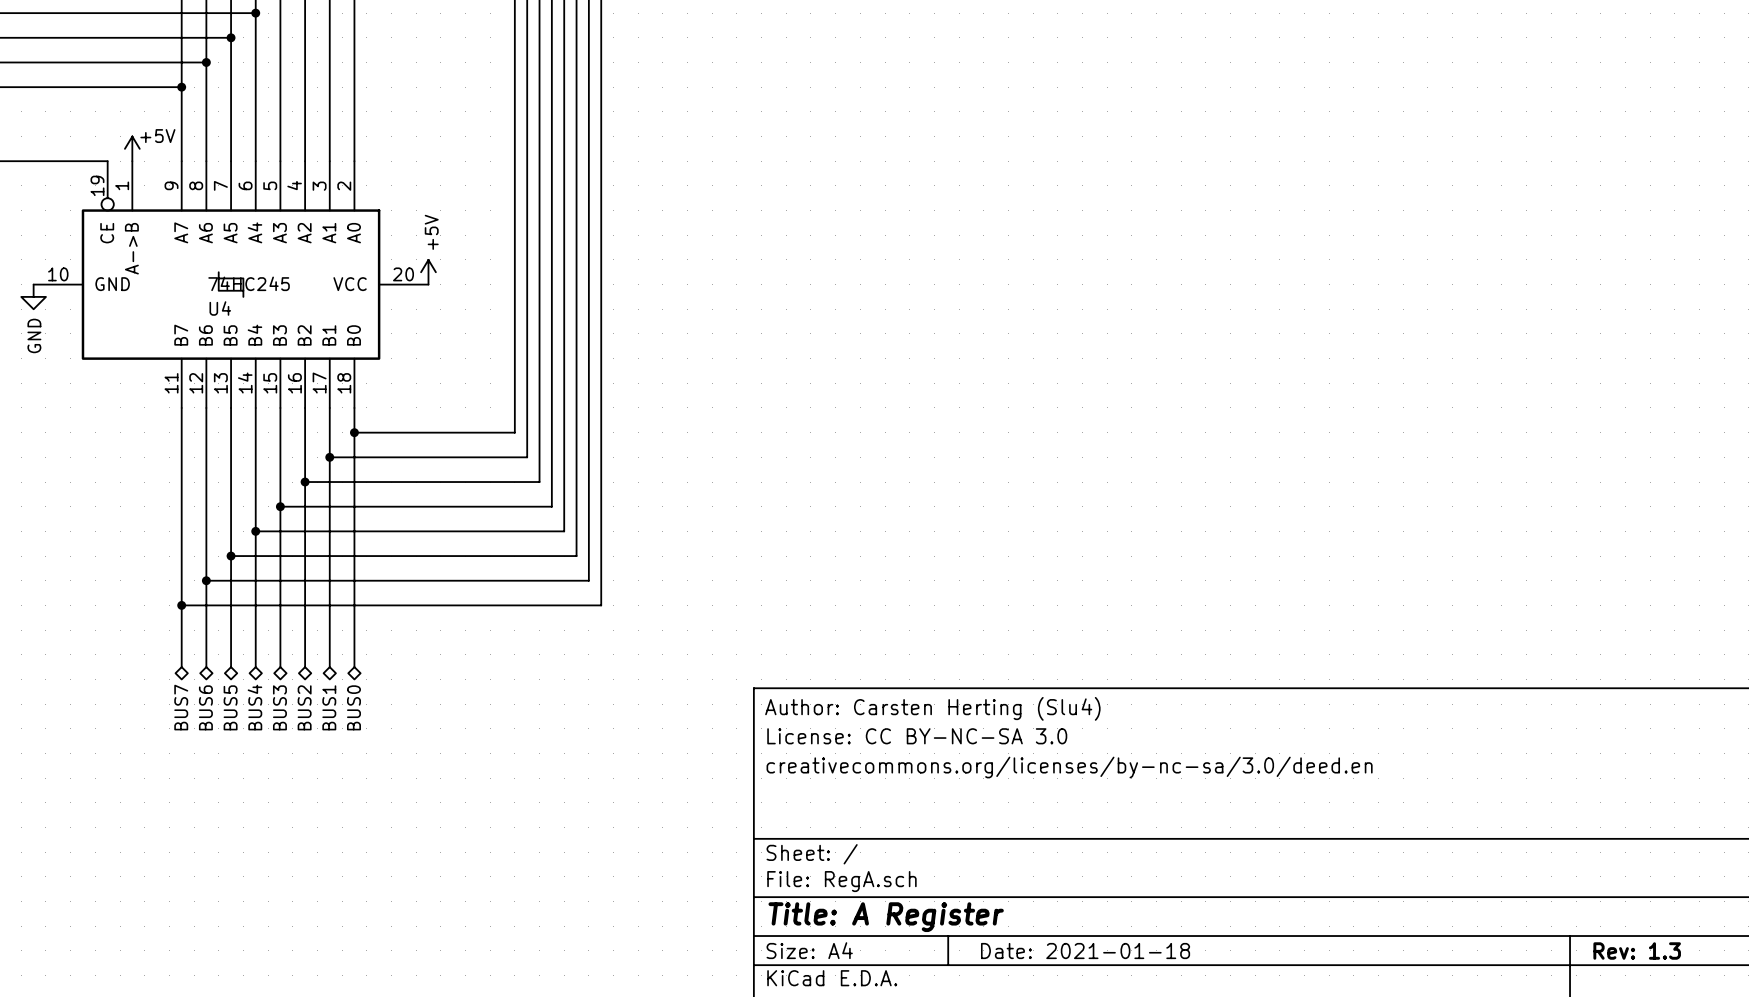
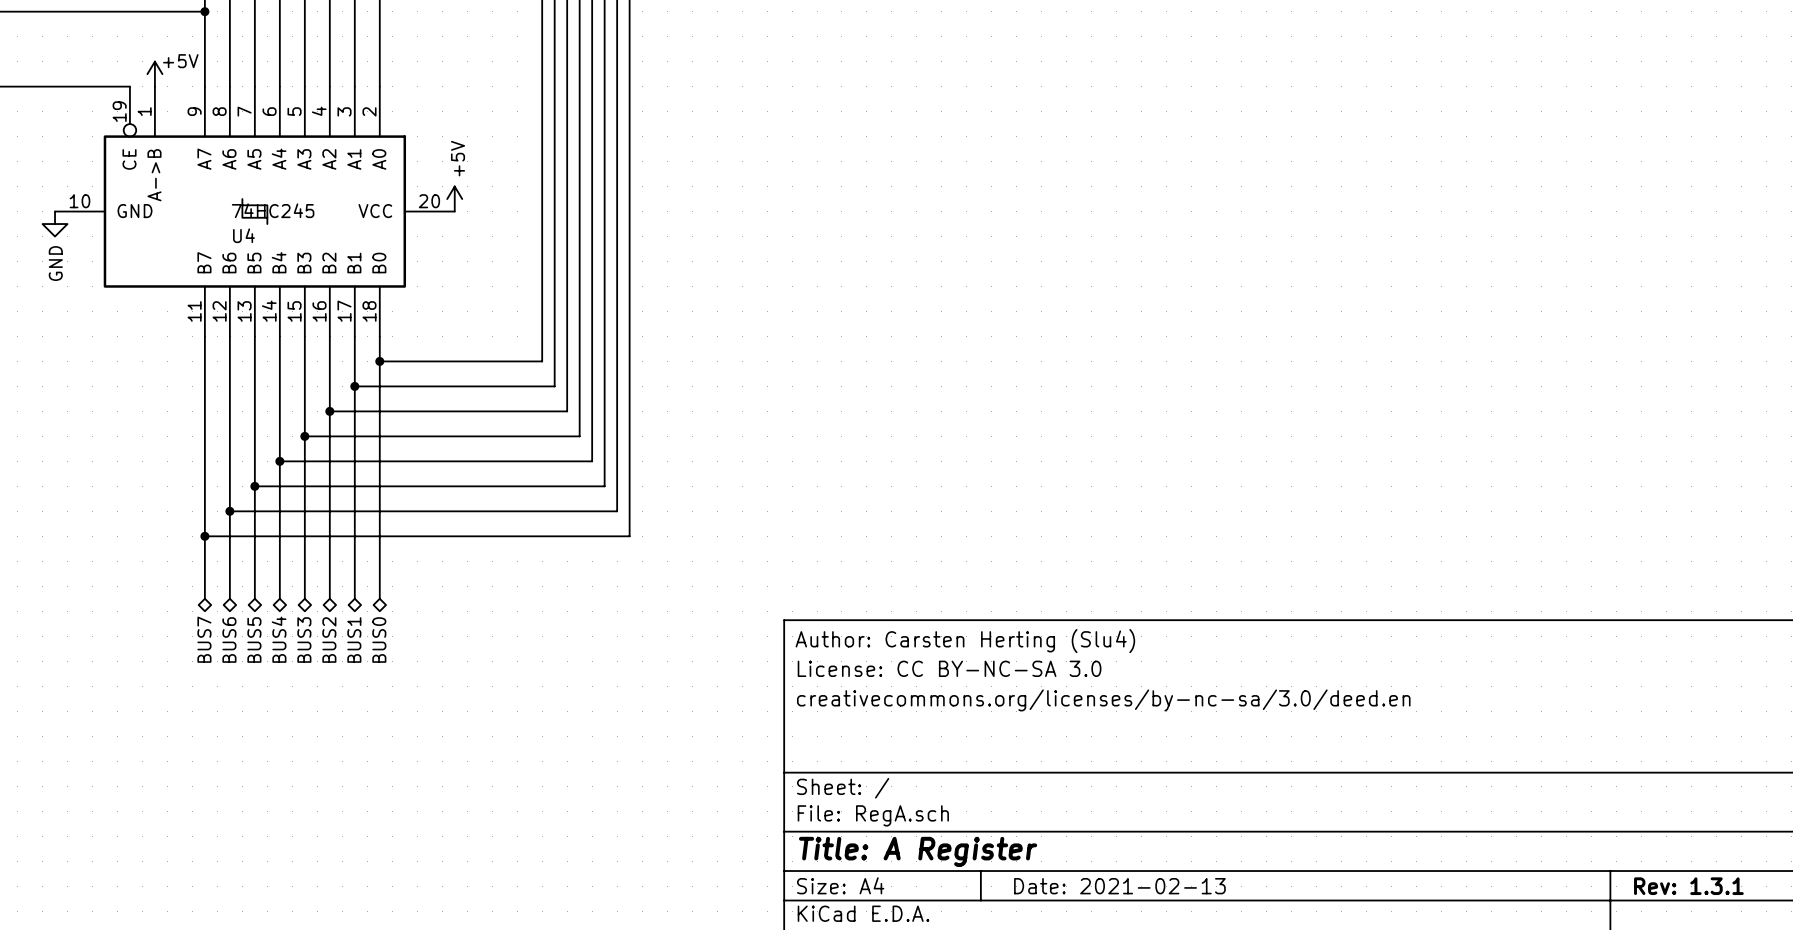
title block: Date: 2021-01-18 (1085, 951) -> Date: 2021-02-13 (1119, 886)
title block: Rev: 1.3 (1637, 951) -> Rev: 1.3.1 (1688, 886)

